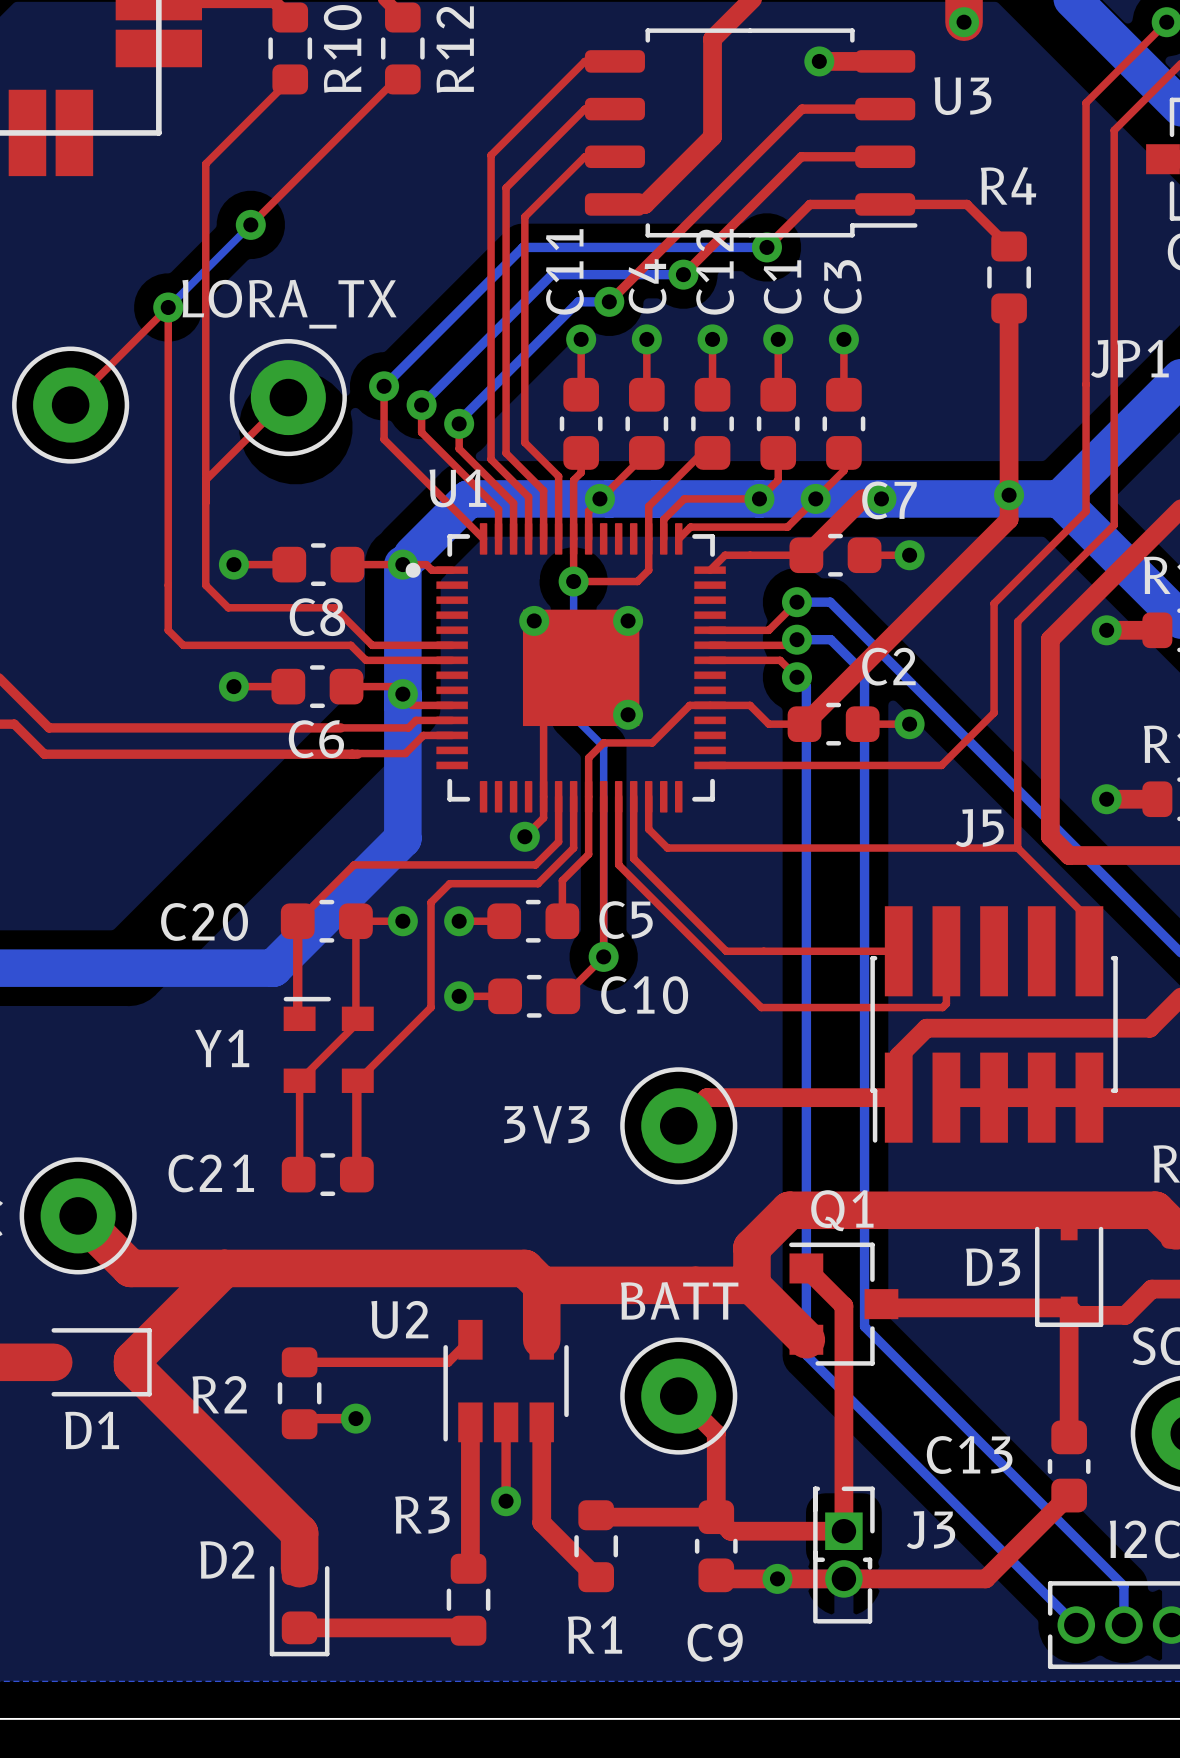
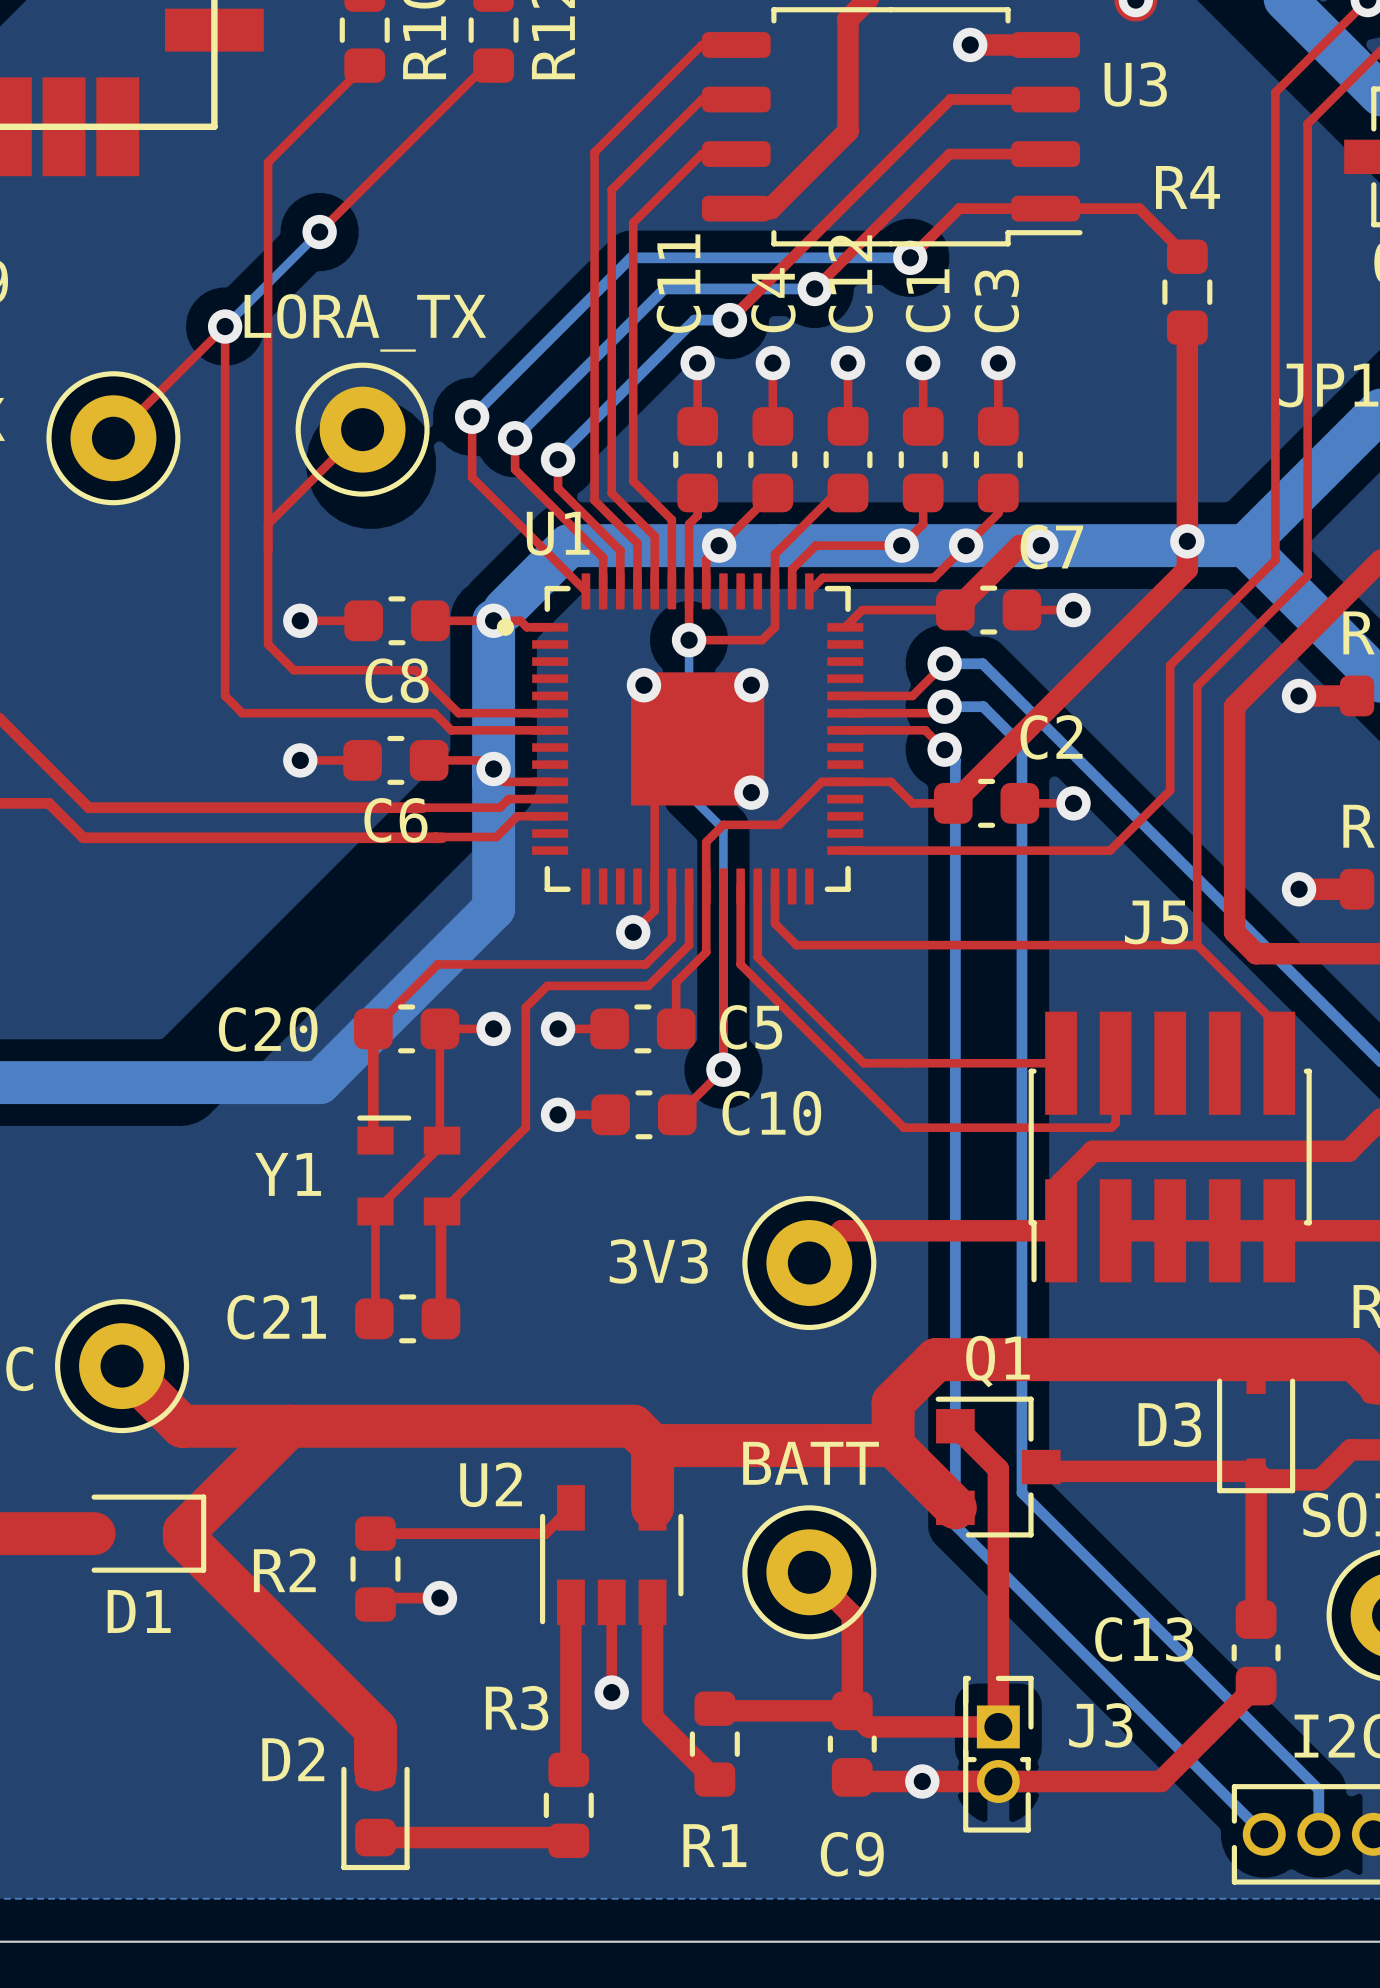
bottom track: (402, 816) (402, 838) (273, 968) (250, 968) -> (493, 908) (319, 1082)

